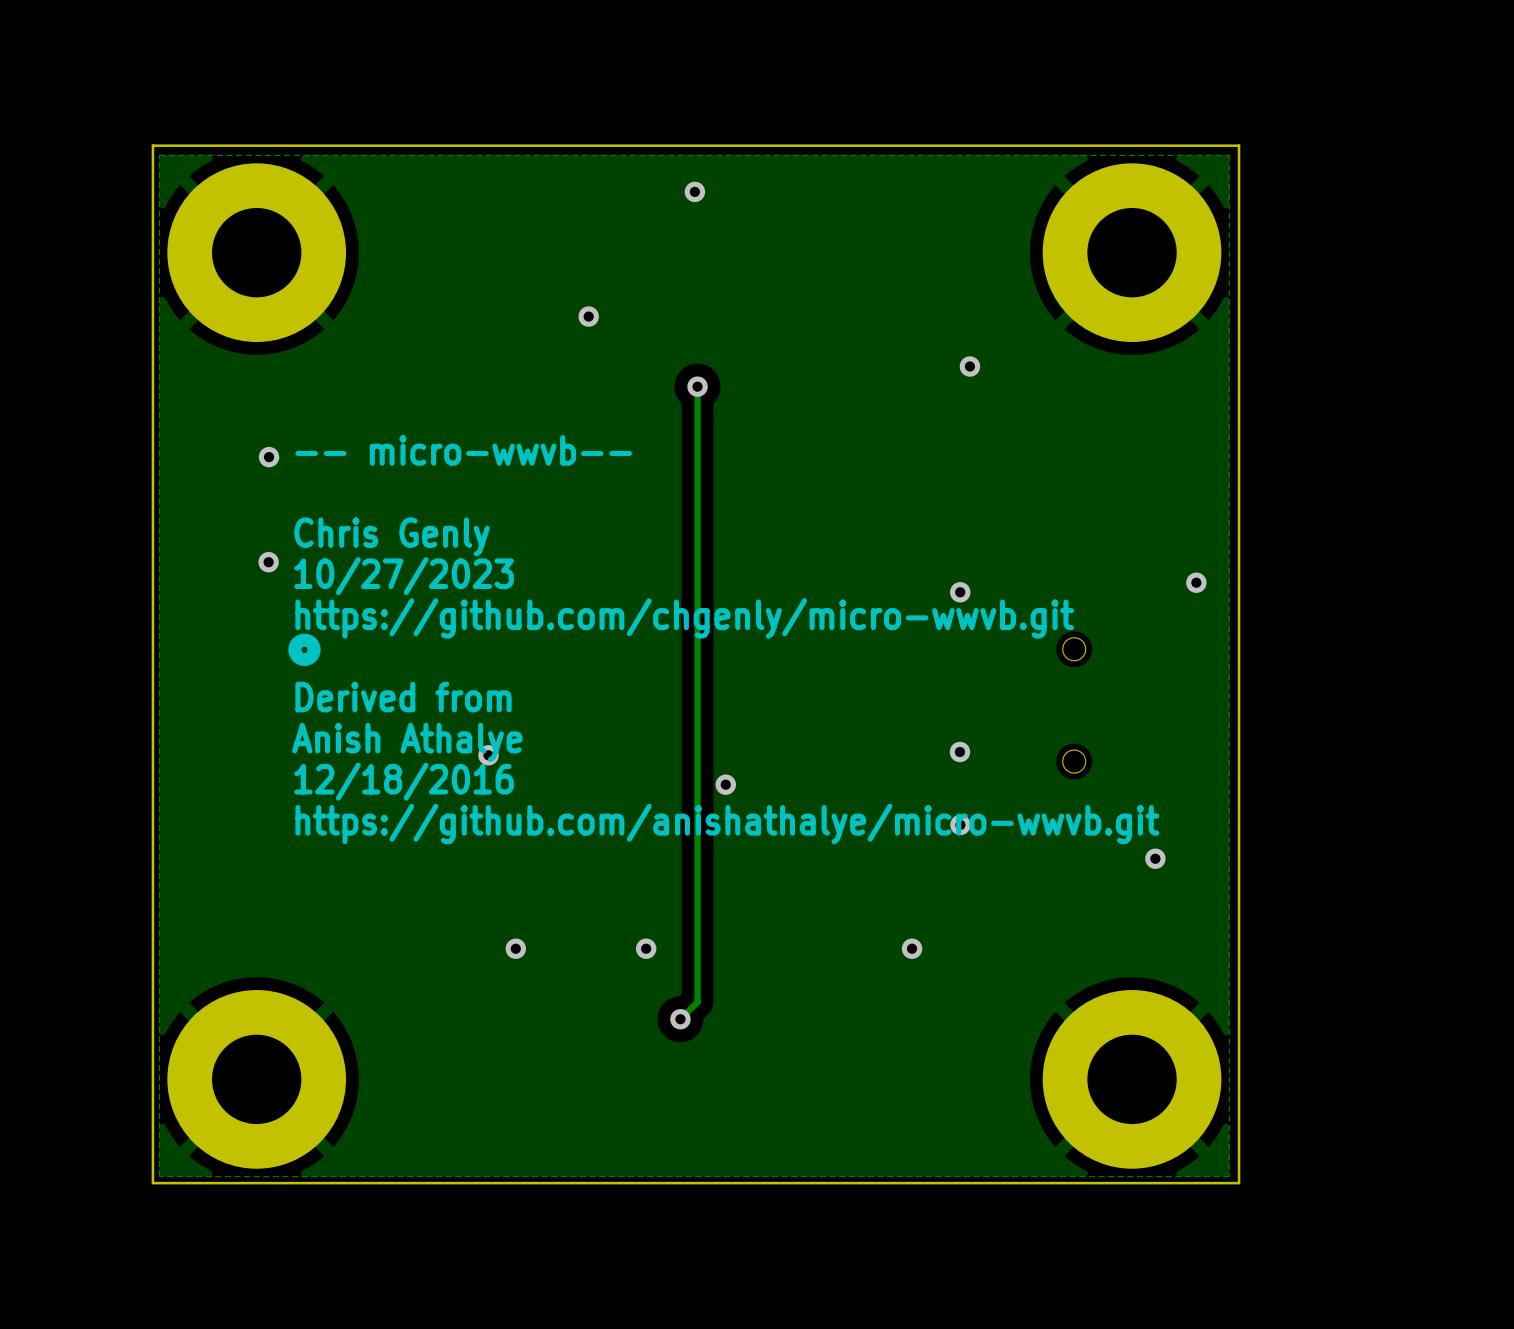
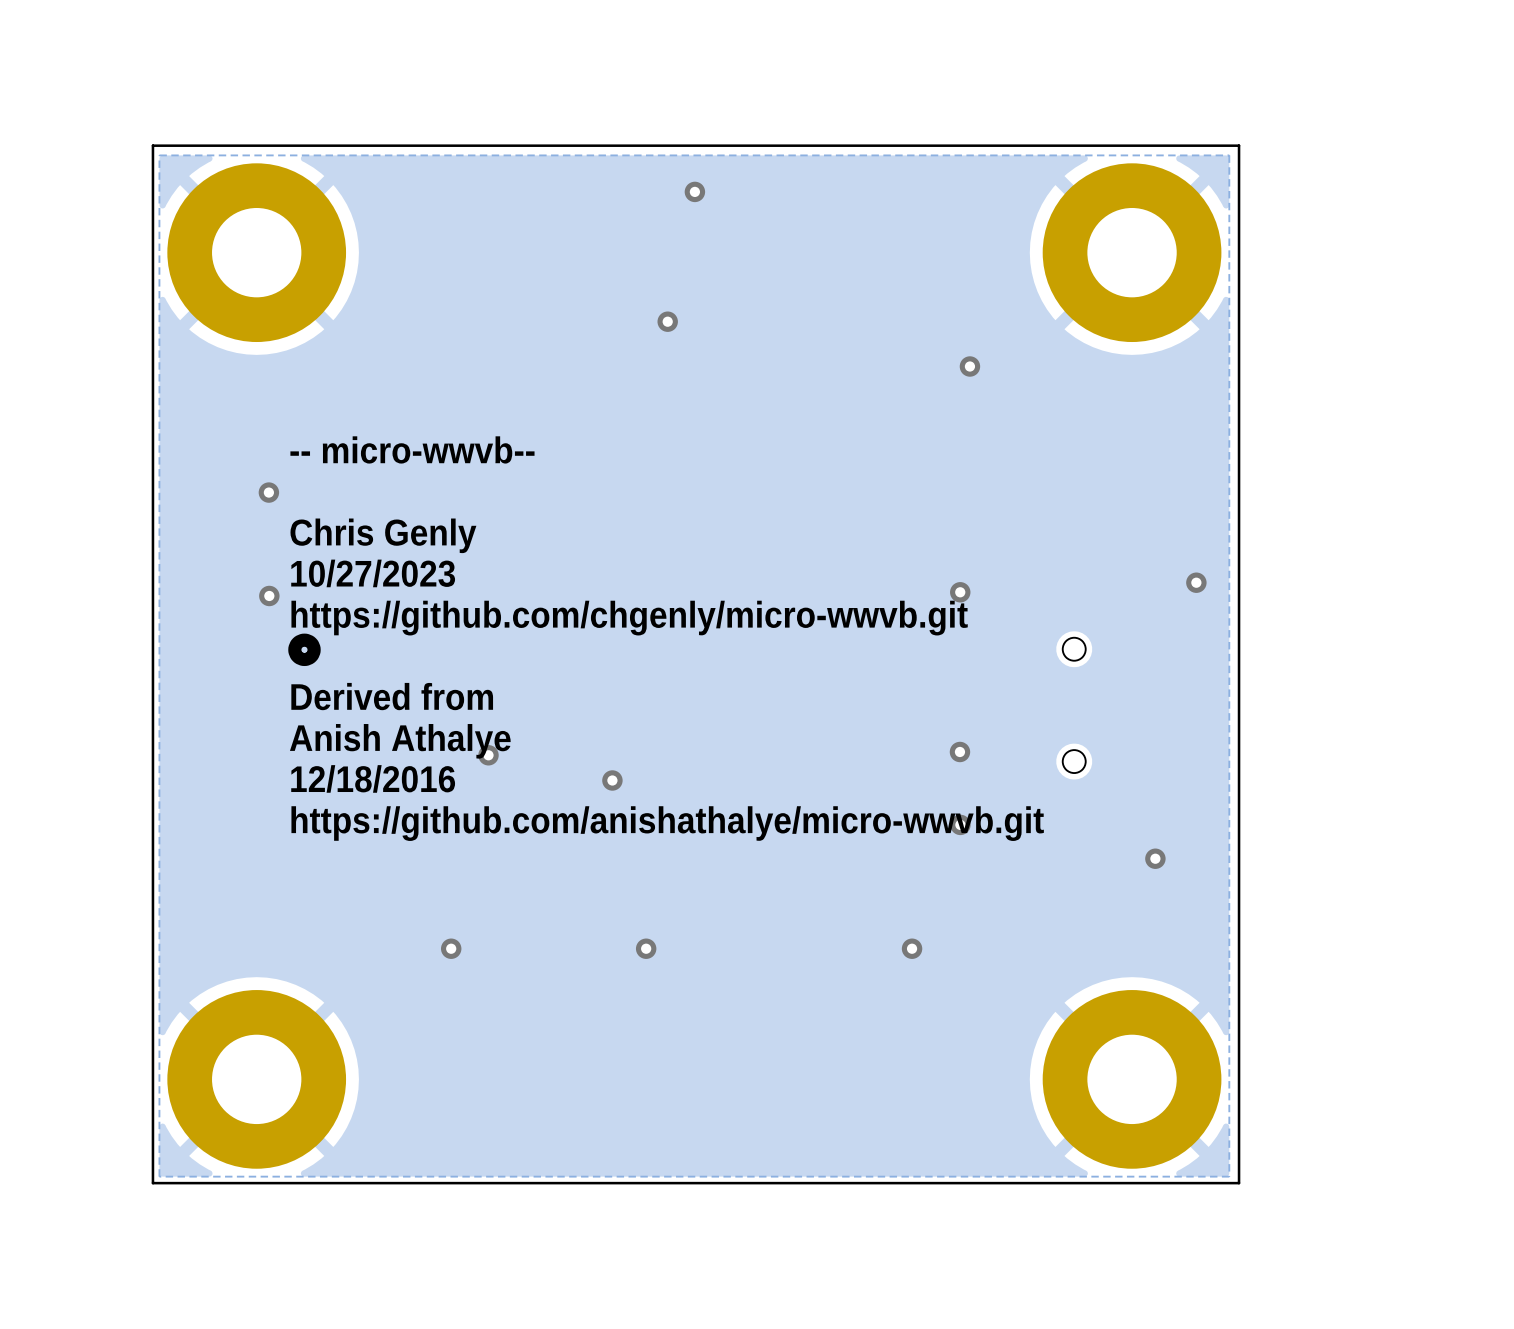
via: (588, 316) -> none
via: none -> (667, 321)
track: (697, 386) (697, 1002) (680, 1019) -> none
via: (697, 386) -> none
via: (269, 457) -> none
via: none -> (268, 492)
via position: (268, 562) -> (269, 595)
via: none -> (612, 780)
via: (725, 784) -> none
via position: (515, 948) -> (451, 948)
via: (680, 1019) -> none

